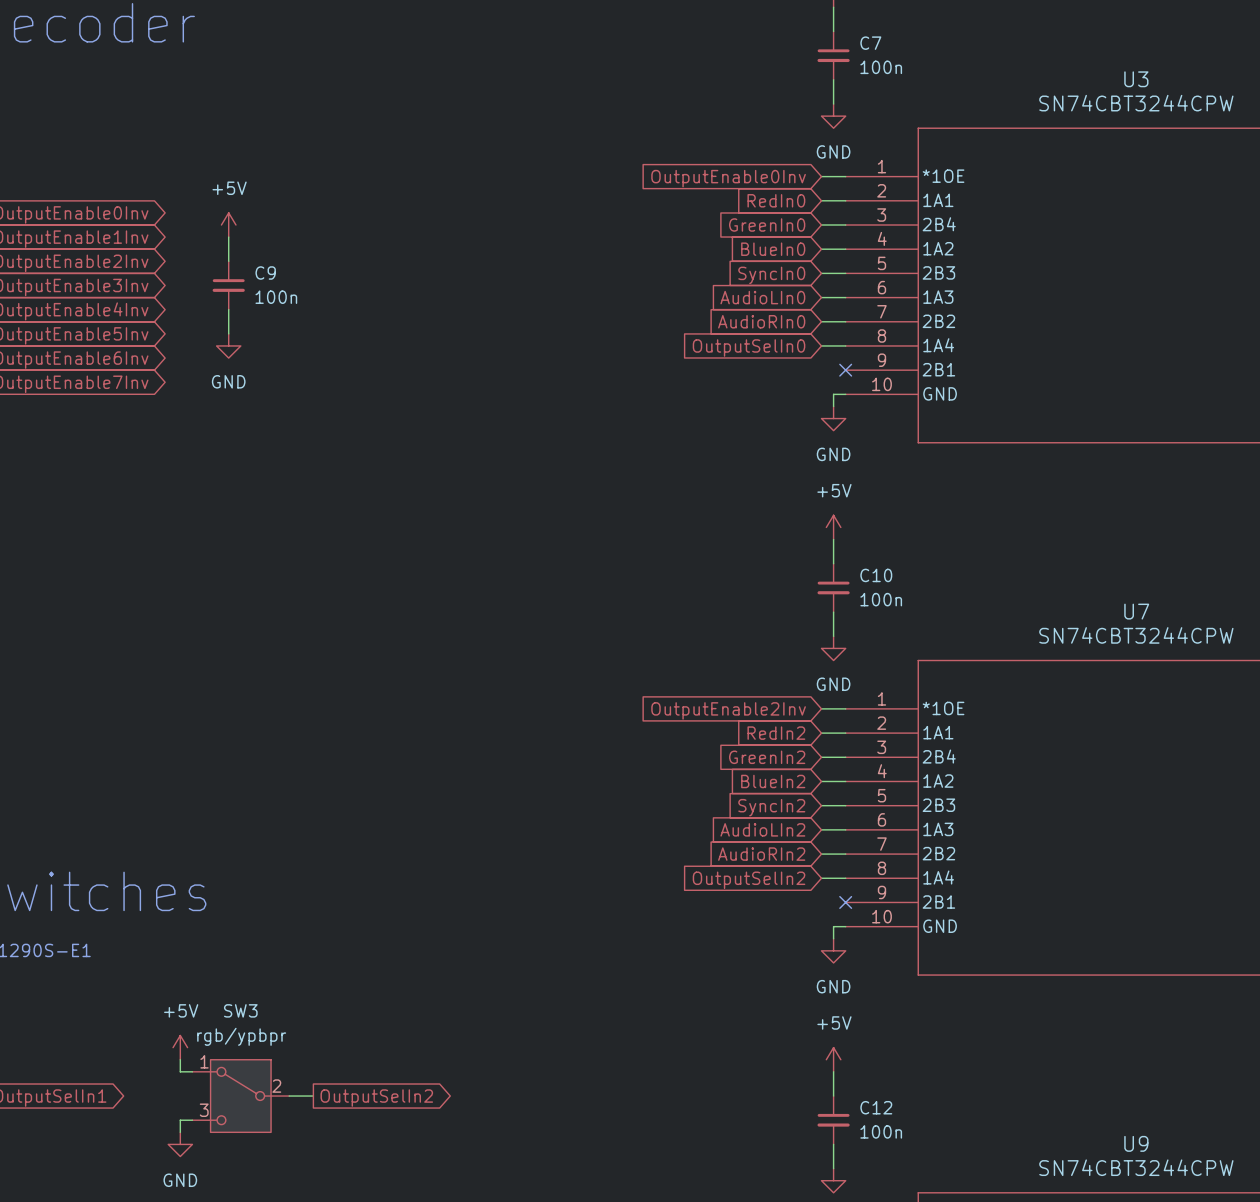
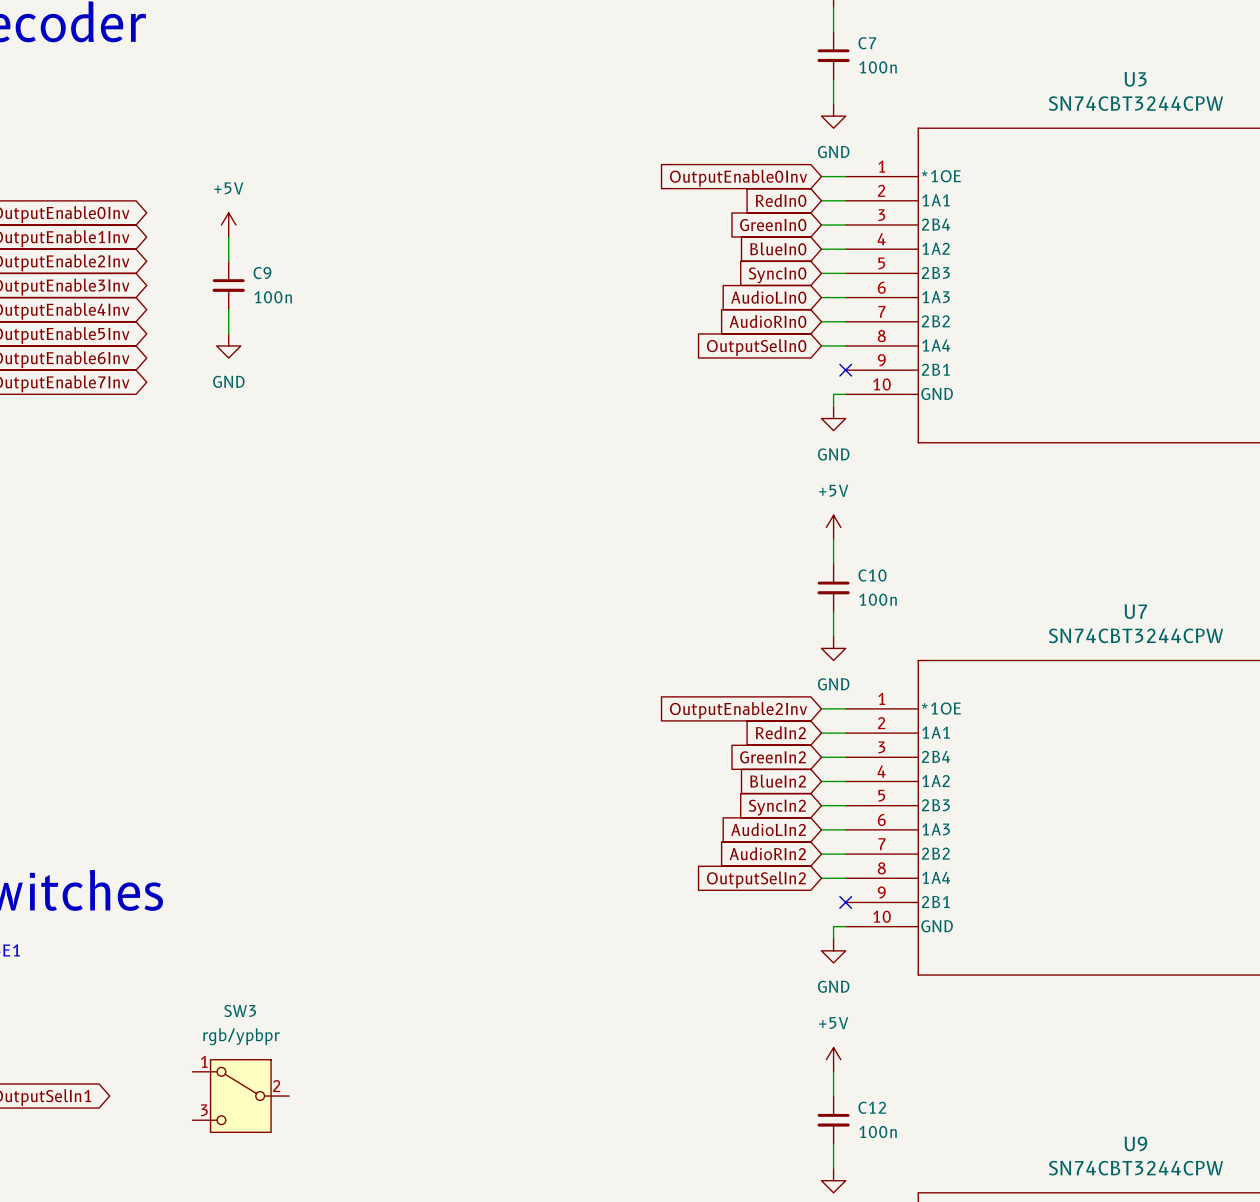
power symbol: +5V (180, 1047) -> none
wire: (180, 1059) (180, 1071) (192, 1071) -> none
wire: (289, 1096) (313, 1096) -> none
global label: OutputSelIn2 (376, 1098) -> none
wire: (192, 1120) (180, 1120) (180, 1132) -> none
power symbol: GND (180, 1144) -> none

